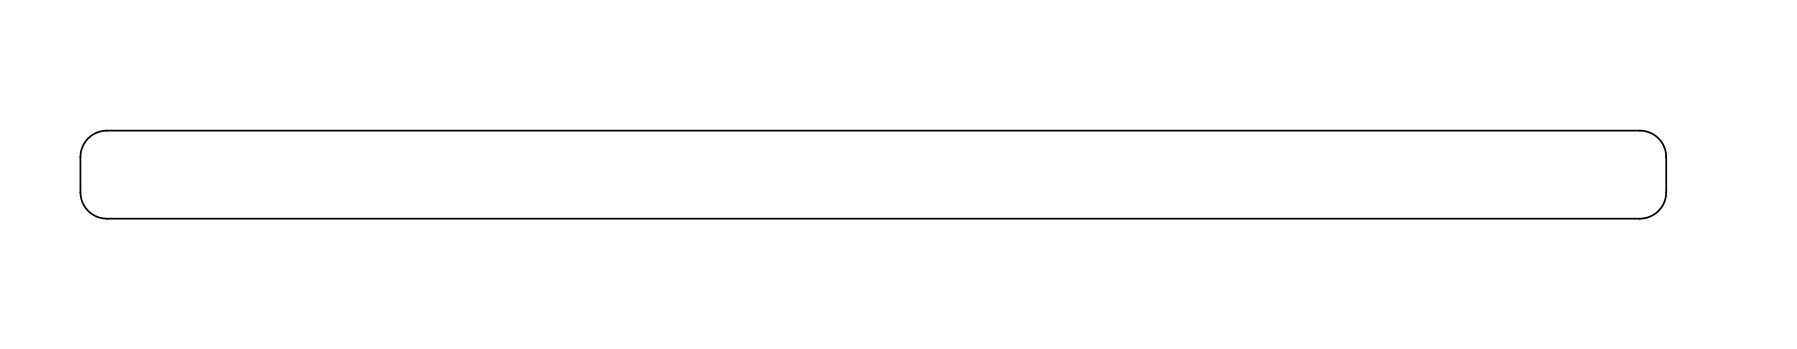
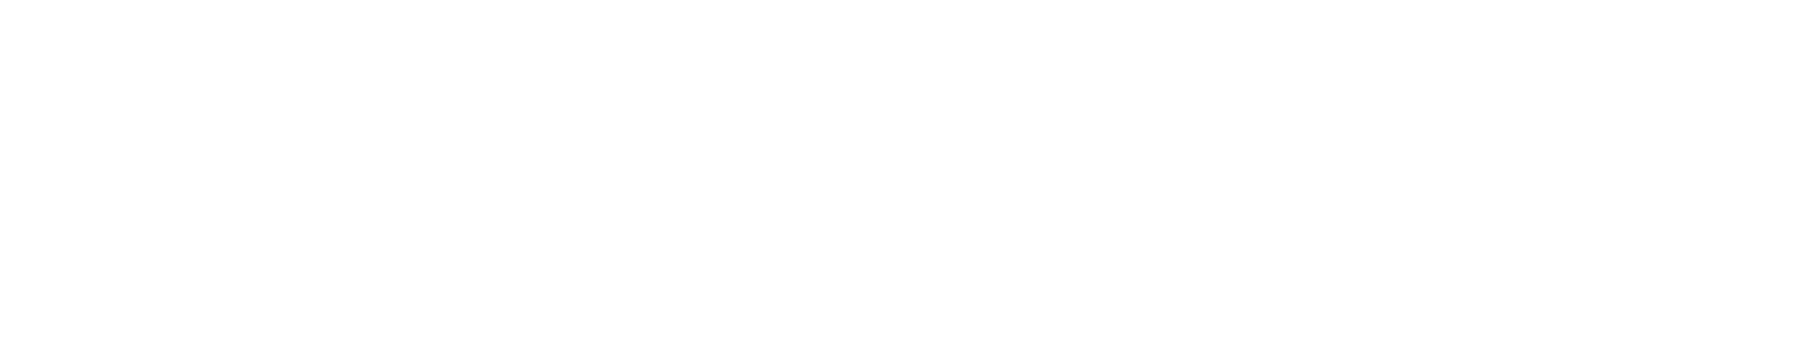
board edge: (1639, 130) (106, 130) (93, 134) (82, 146) (80, 157) (80, 192) (82, 202) (88, 210) (96, 216) (106, 218) (1639, 218) (1649, 216) (1658, 210) (1664, 202) (1666, 192) (1666, 157) (1664, 146) (1655, 136) (1639, 130) -> none

